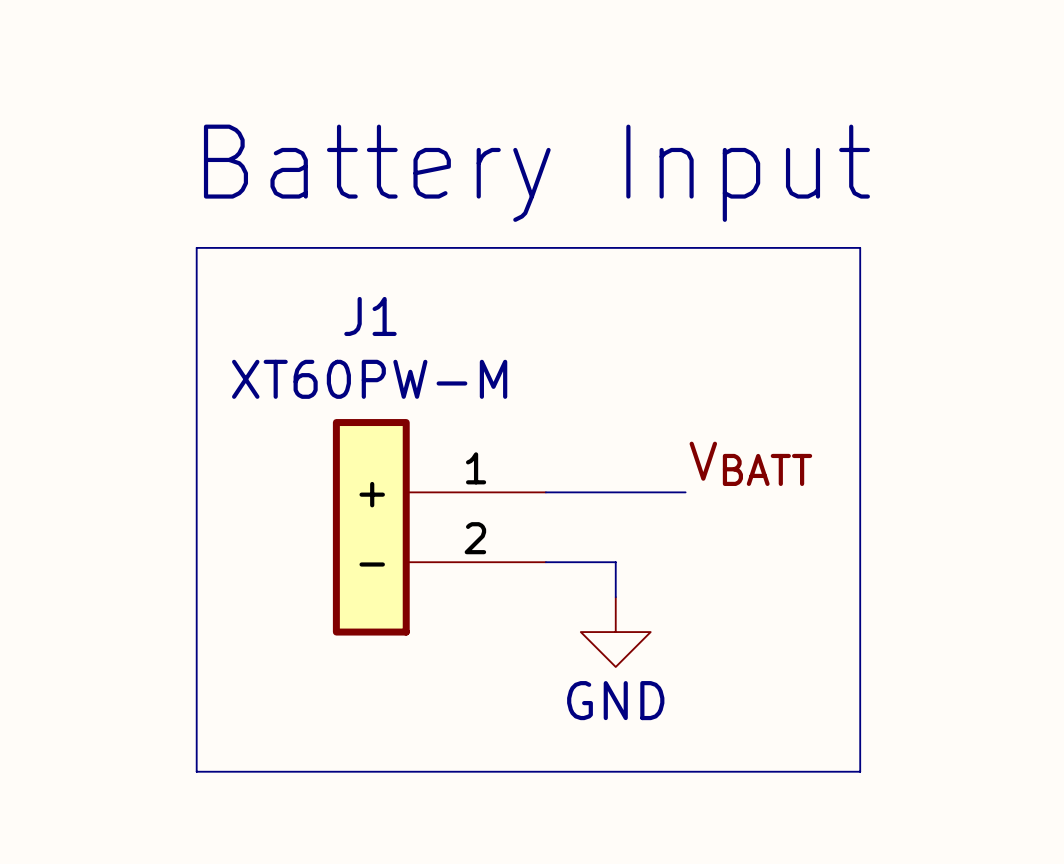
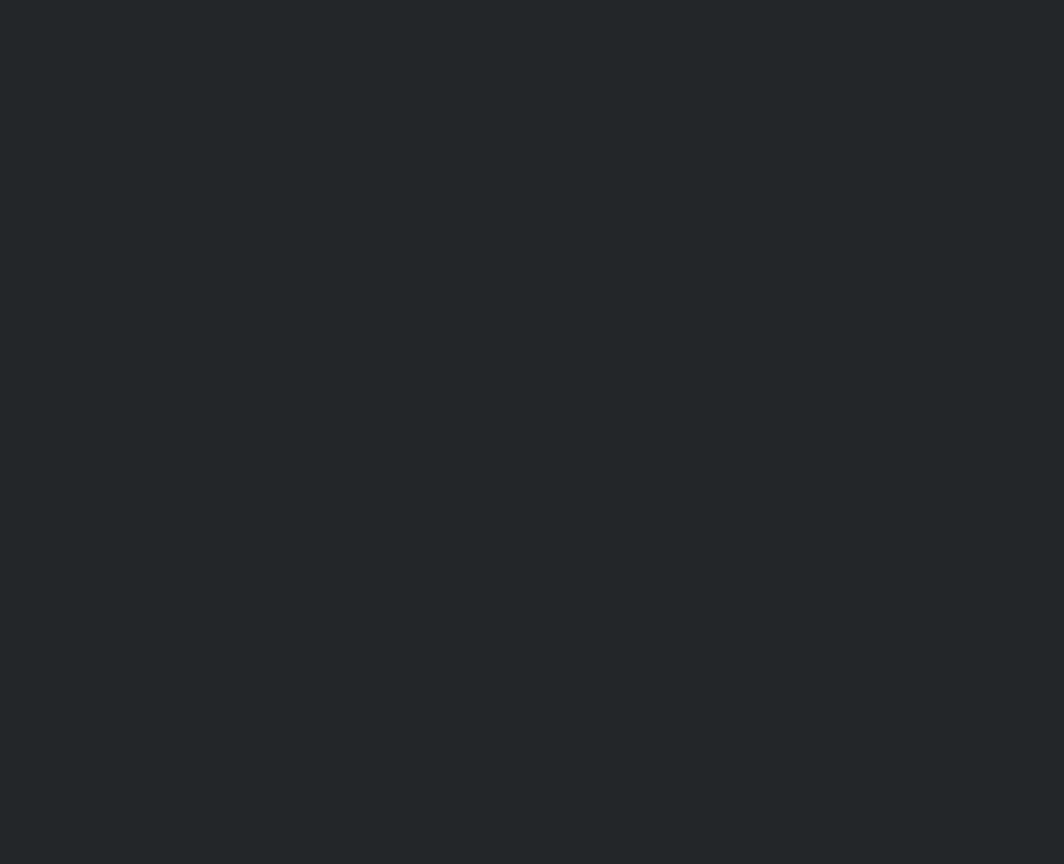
text: Battery Input (536, 173) -> none
line: (196, 247) (860, 247) (860, 771) (196, 771) (196, 247) -> none
label: VBATT (750, 463) -> none
wire: (545, 492) (685, 492) -> none
J1: XT60PW-M (439, 527) -> none
wire: (545, 562) (615, 562) (615, 597) -> none
power symbol: GND (615, 632) -> none

